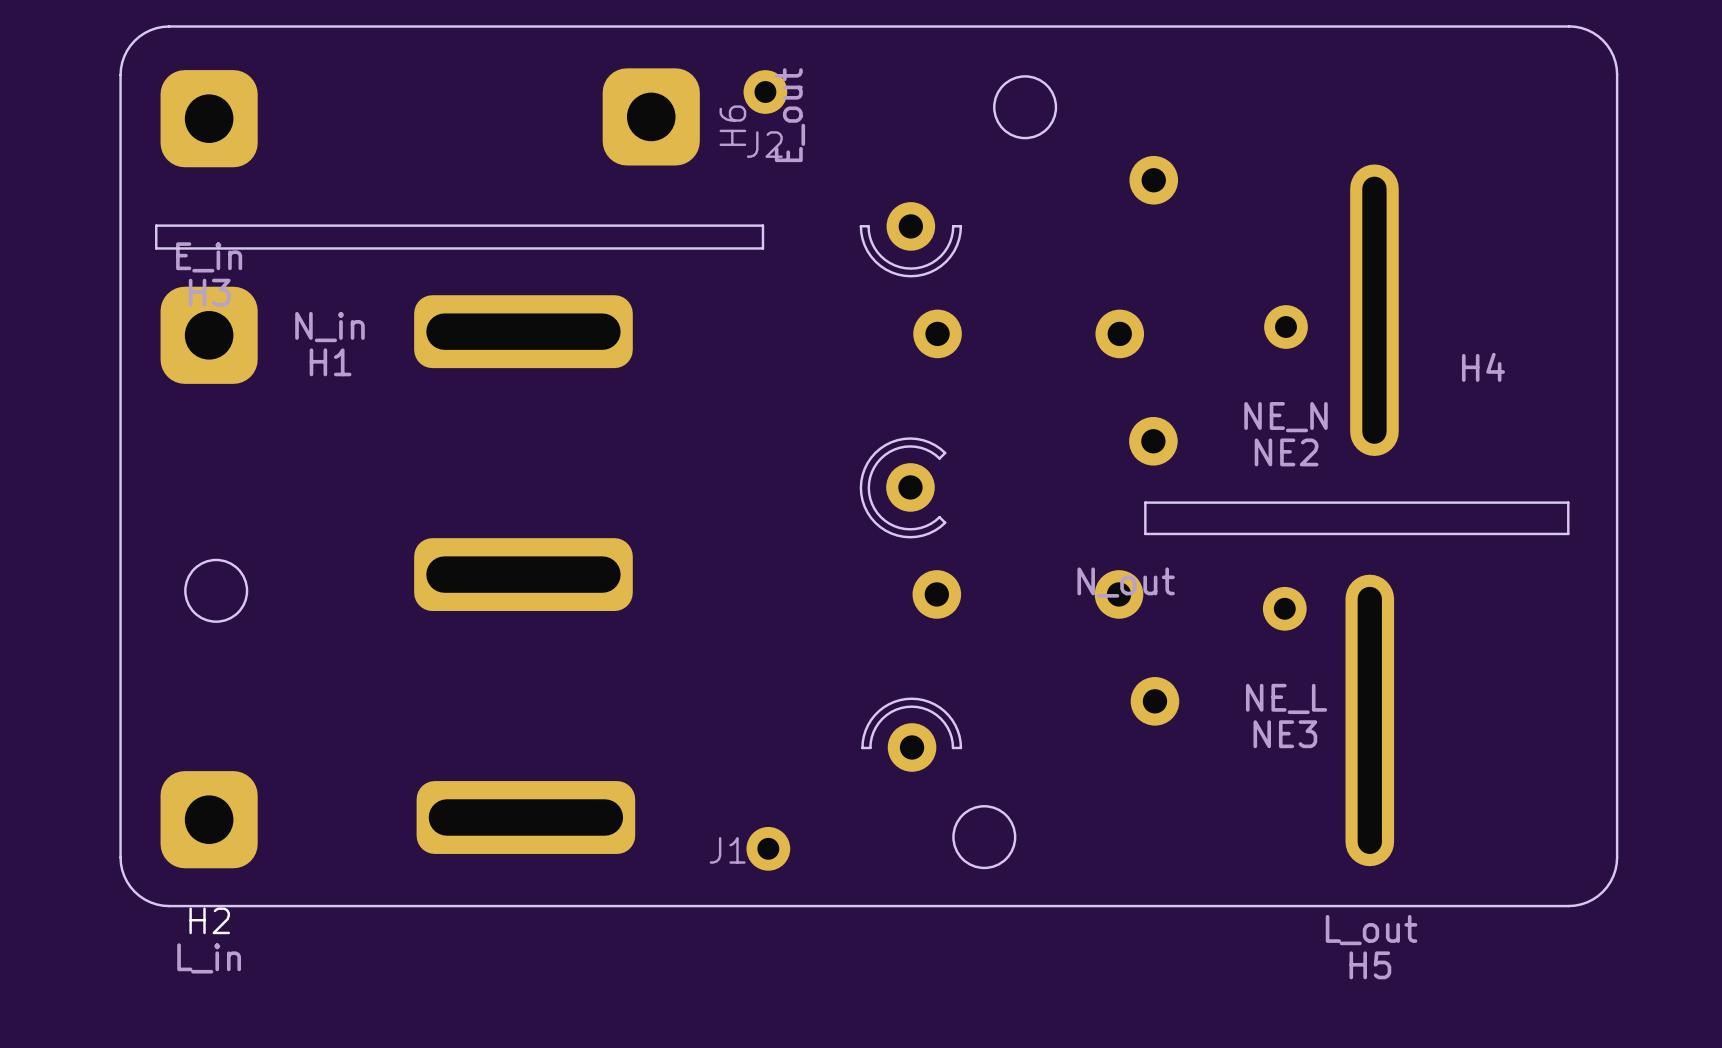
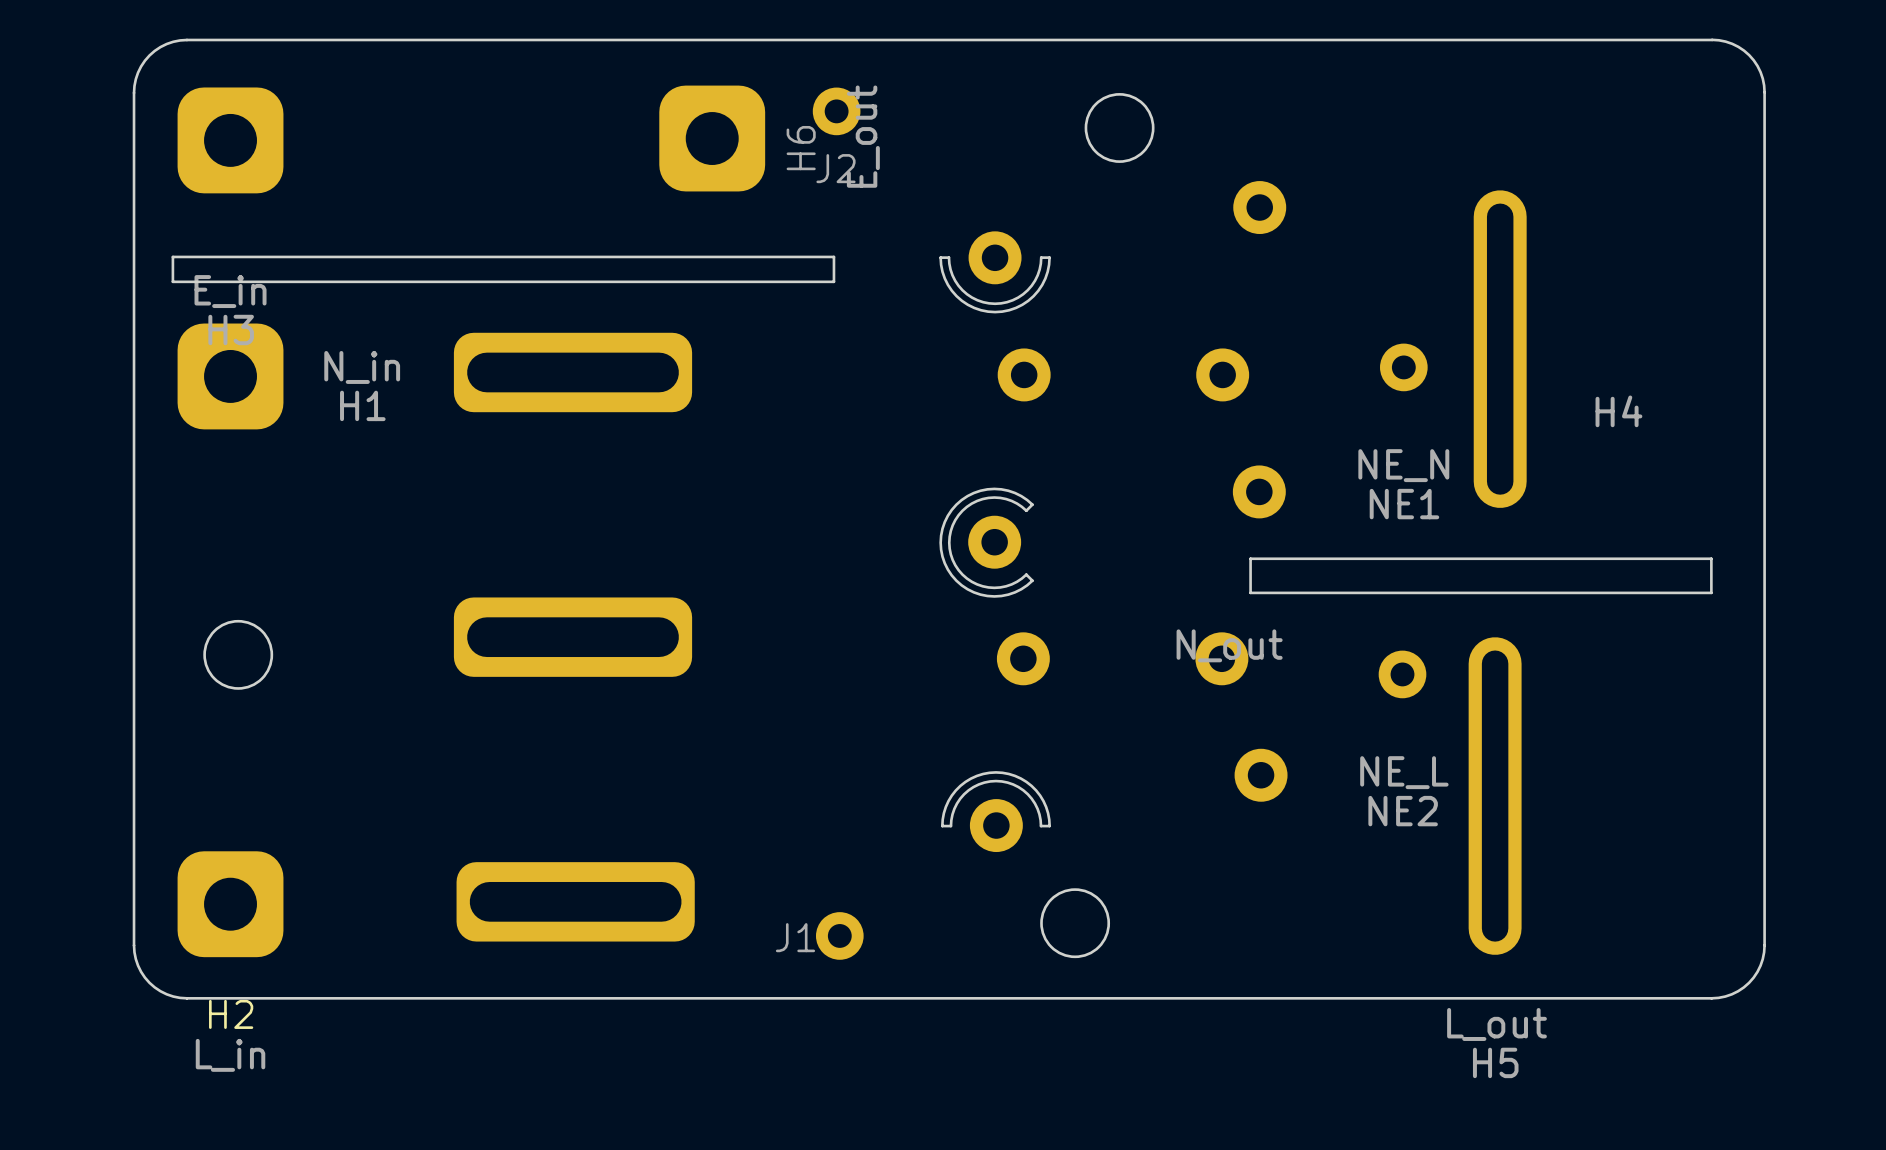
NE2 name: NE2 (1286, 452) -> NE1 (1404, 504)
NE3 name: NE3 (1285, 734) -> NE2 (1403, 811)

